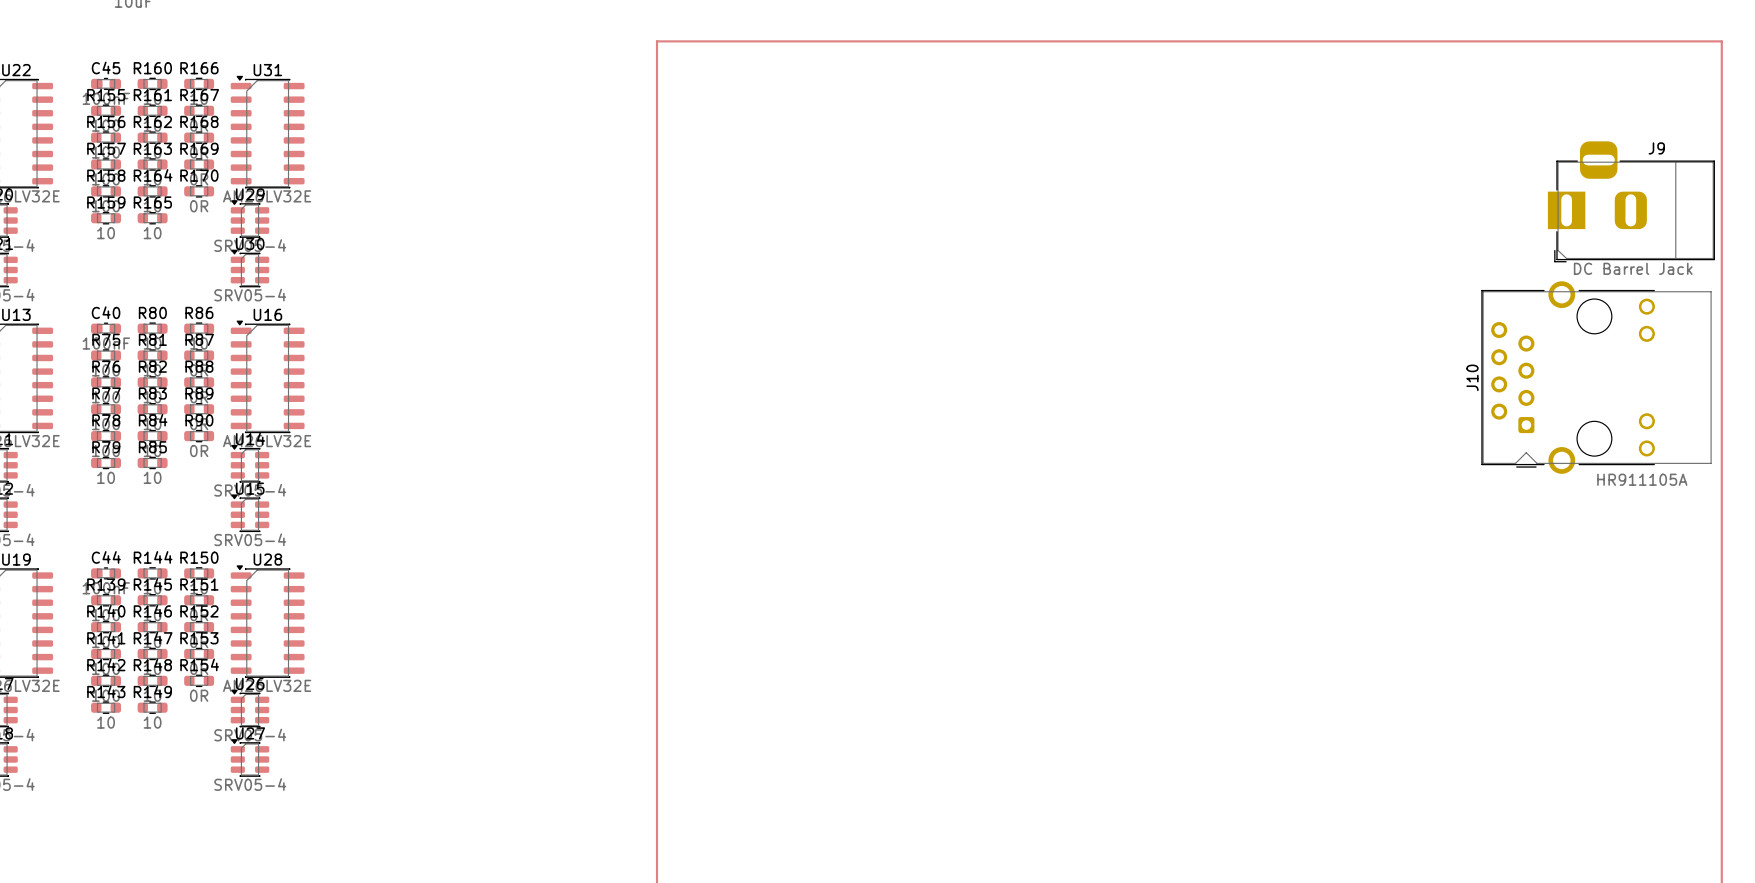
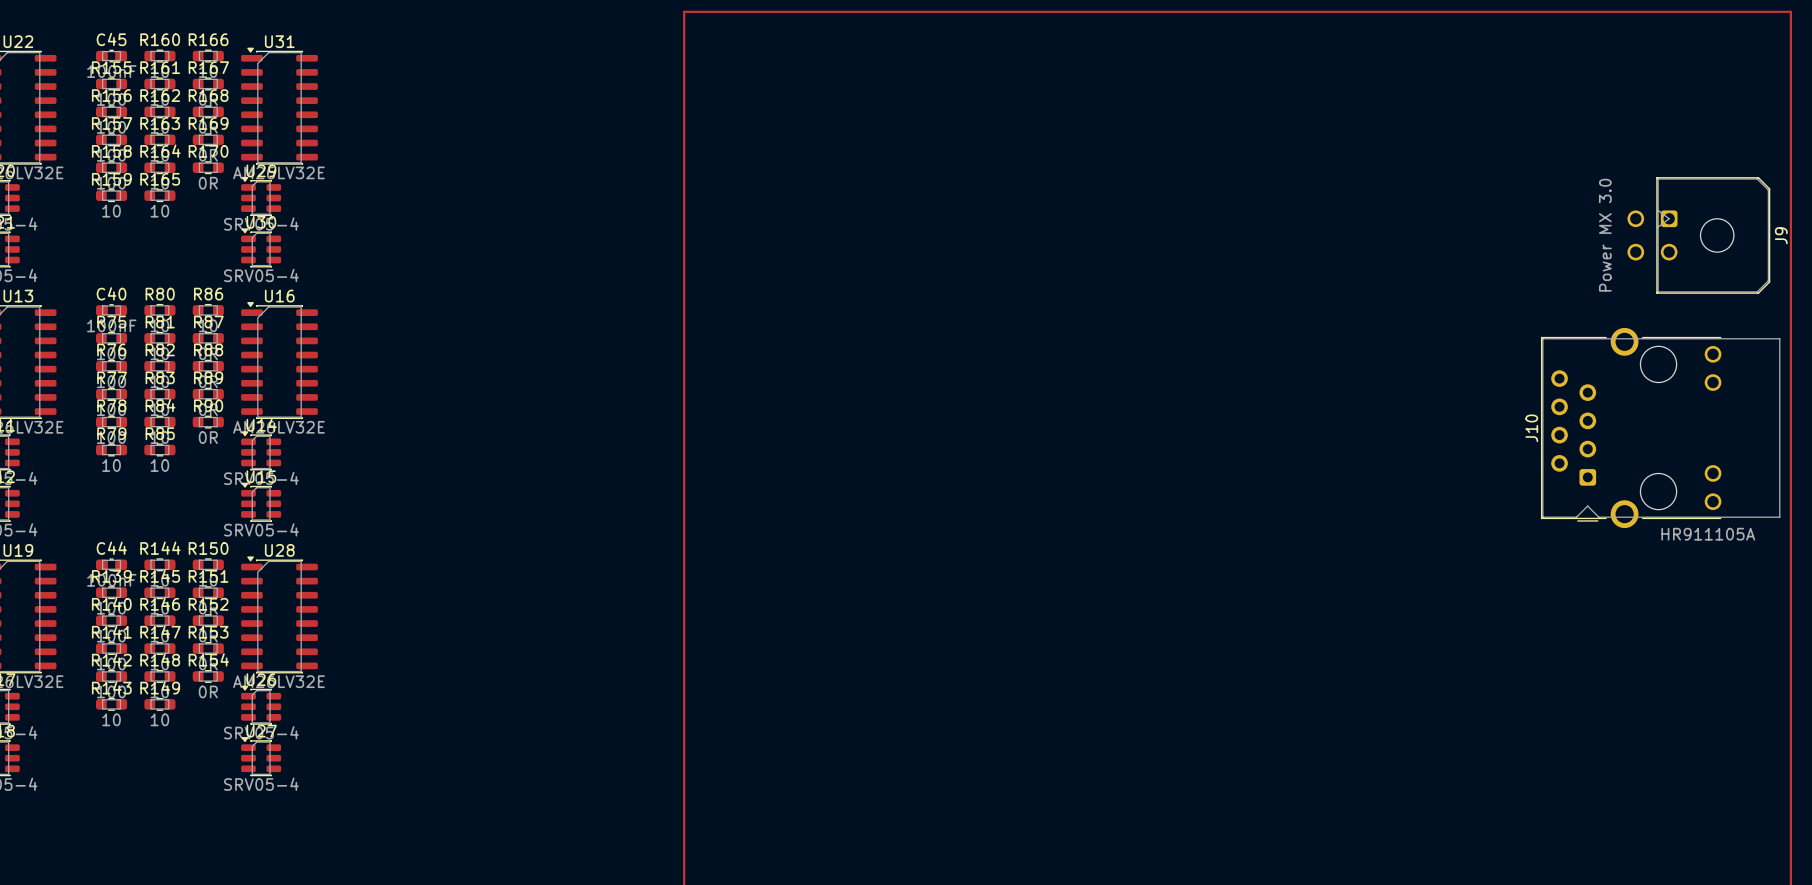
J9 footprint: [1547, 141, 1715, 263] -> [1627, 177, 1771, 294]
J9 name position: J9 (1656, 148) -> J9 (1781, 235)
J9 value: DC Barrel Jack (1633, 268) -> Power MX 3.0 (1605, 235)
J10 position: (1596, 377) -> (1660, 427)

